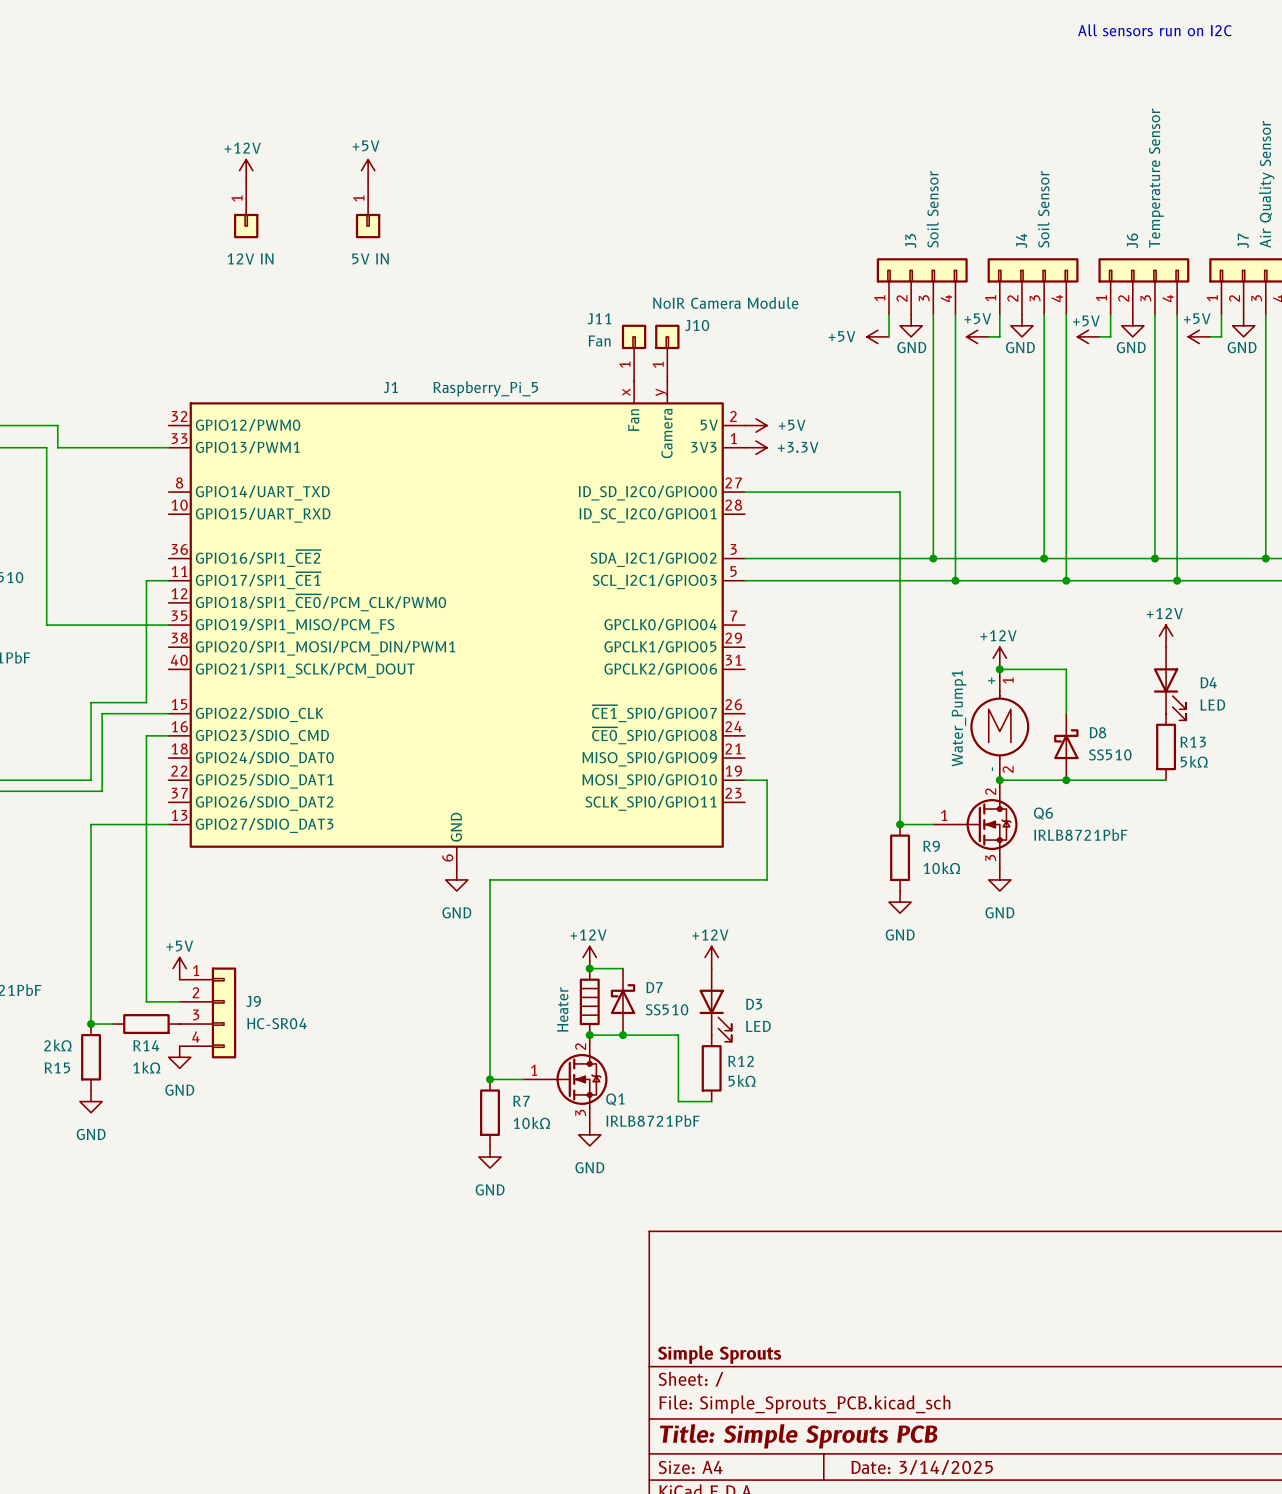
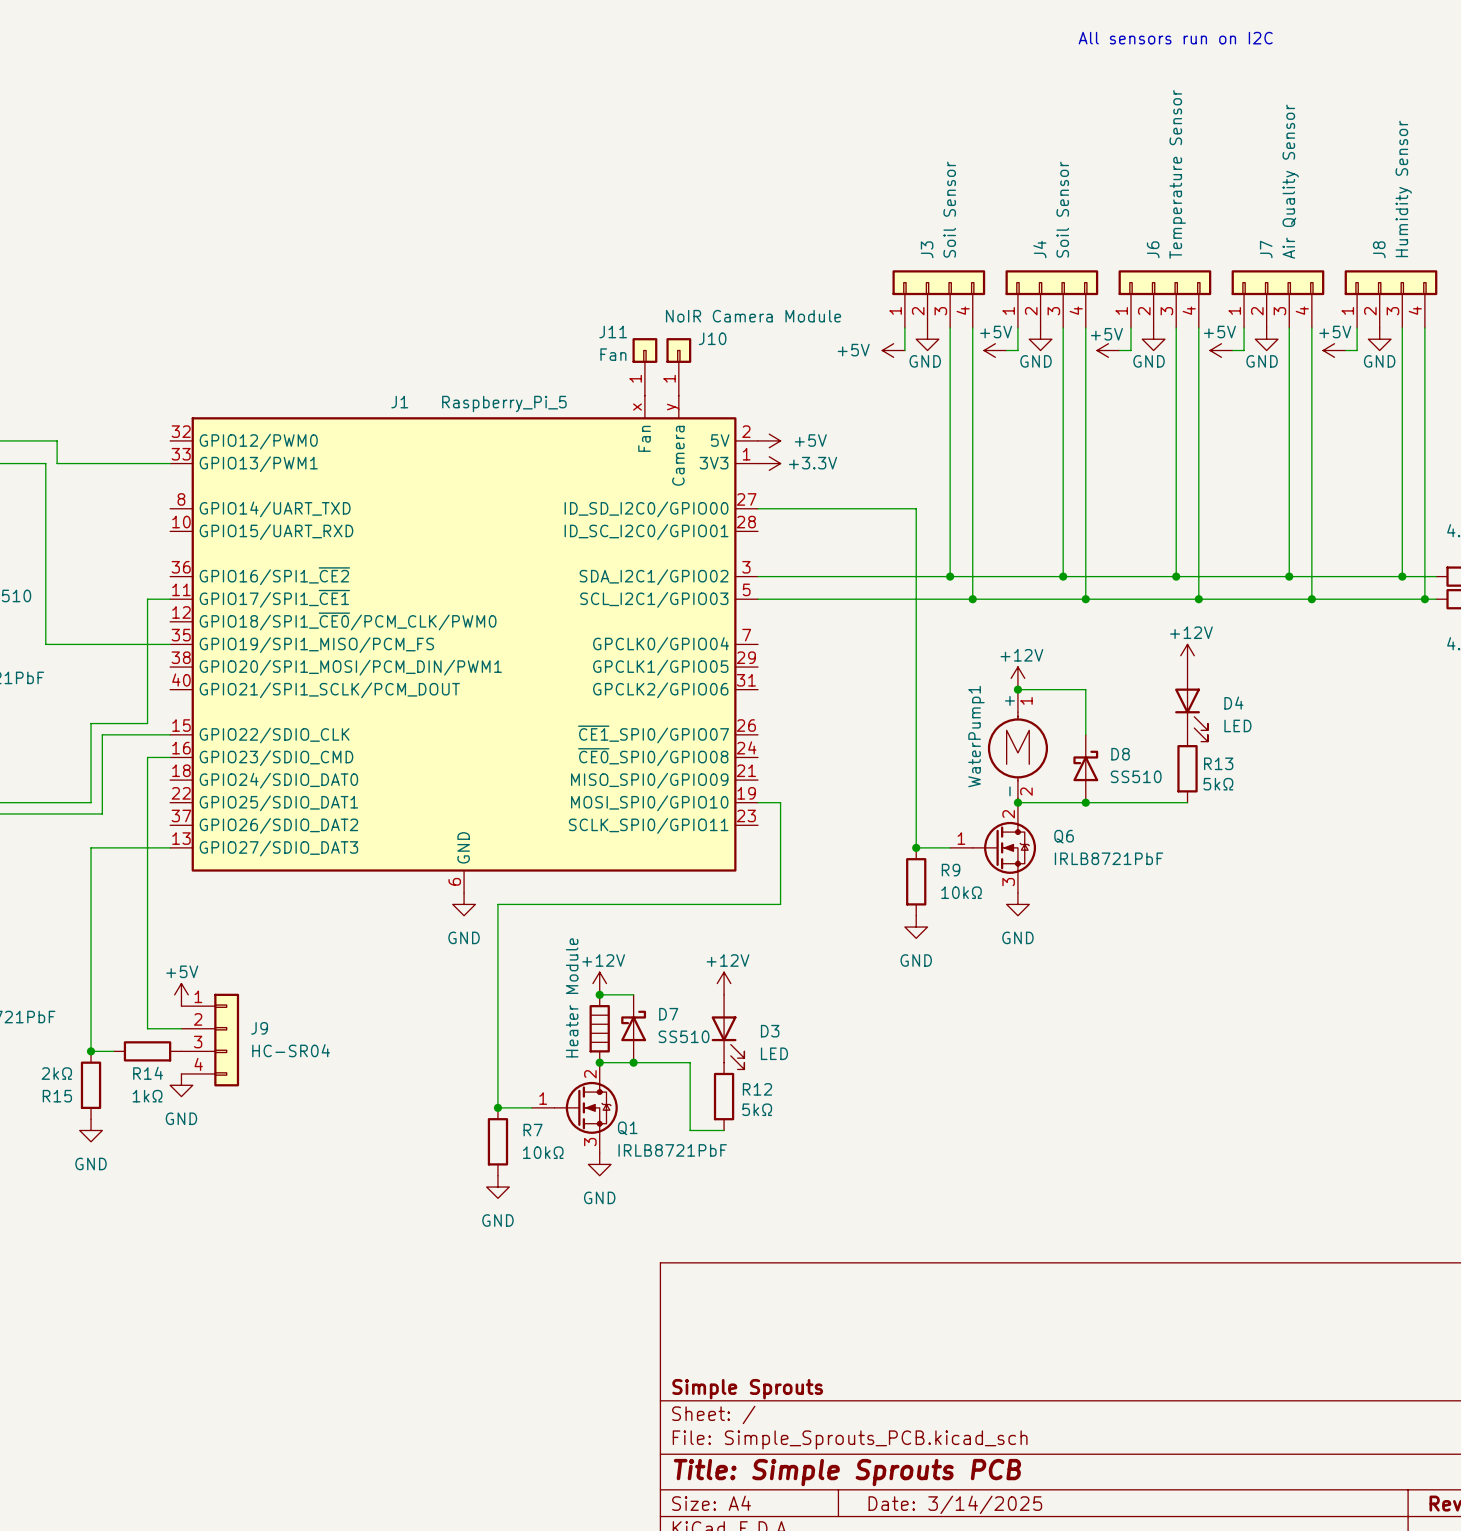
power symbol: +12V (246, 170) -> none
power symbol: +5V (368, 170) -> none
part: 12V IN (246, 209) -> none
part: 5V IN (368, 209) -> none
Water_Pump1 name: Water_Pump1 (959, 718) -> WaterPump1 (976, 736)
part value: Heater (562, 1009) -> Heater Module (572, 997)

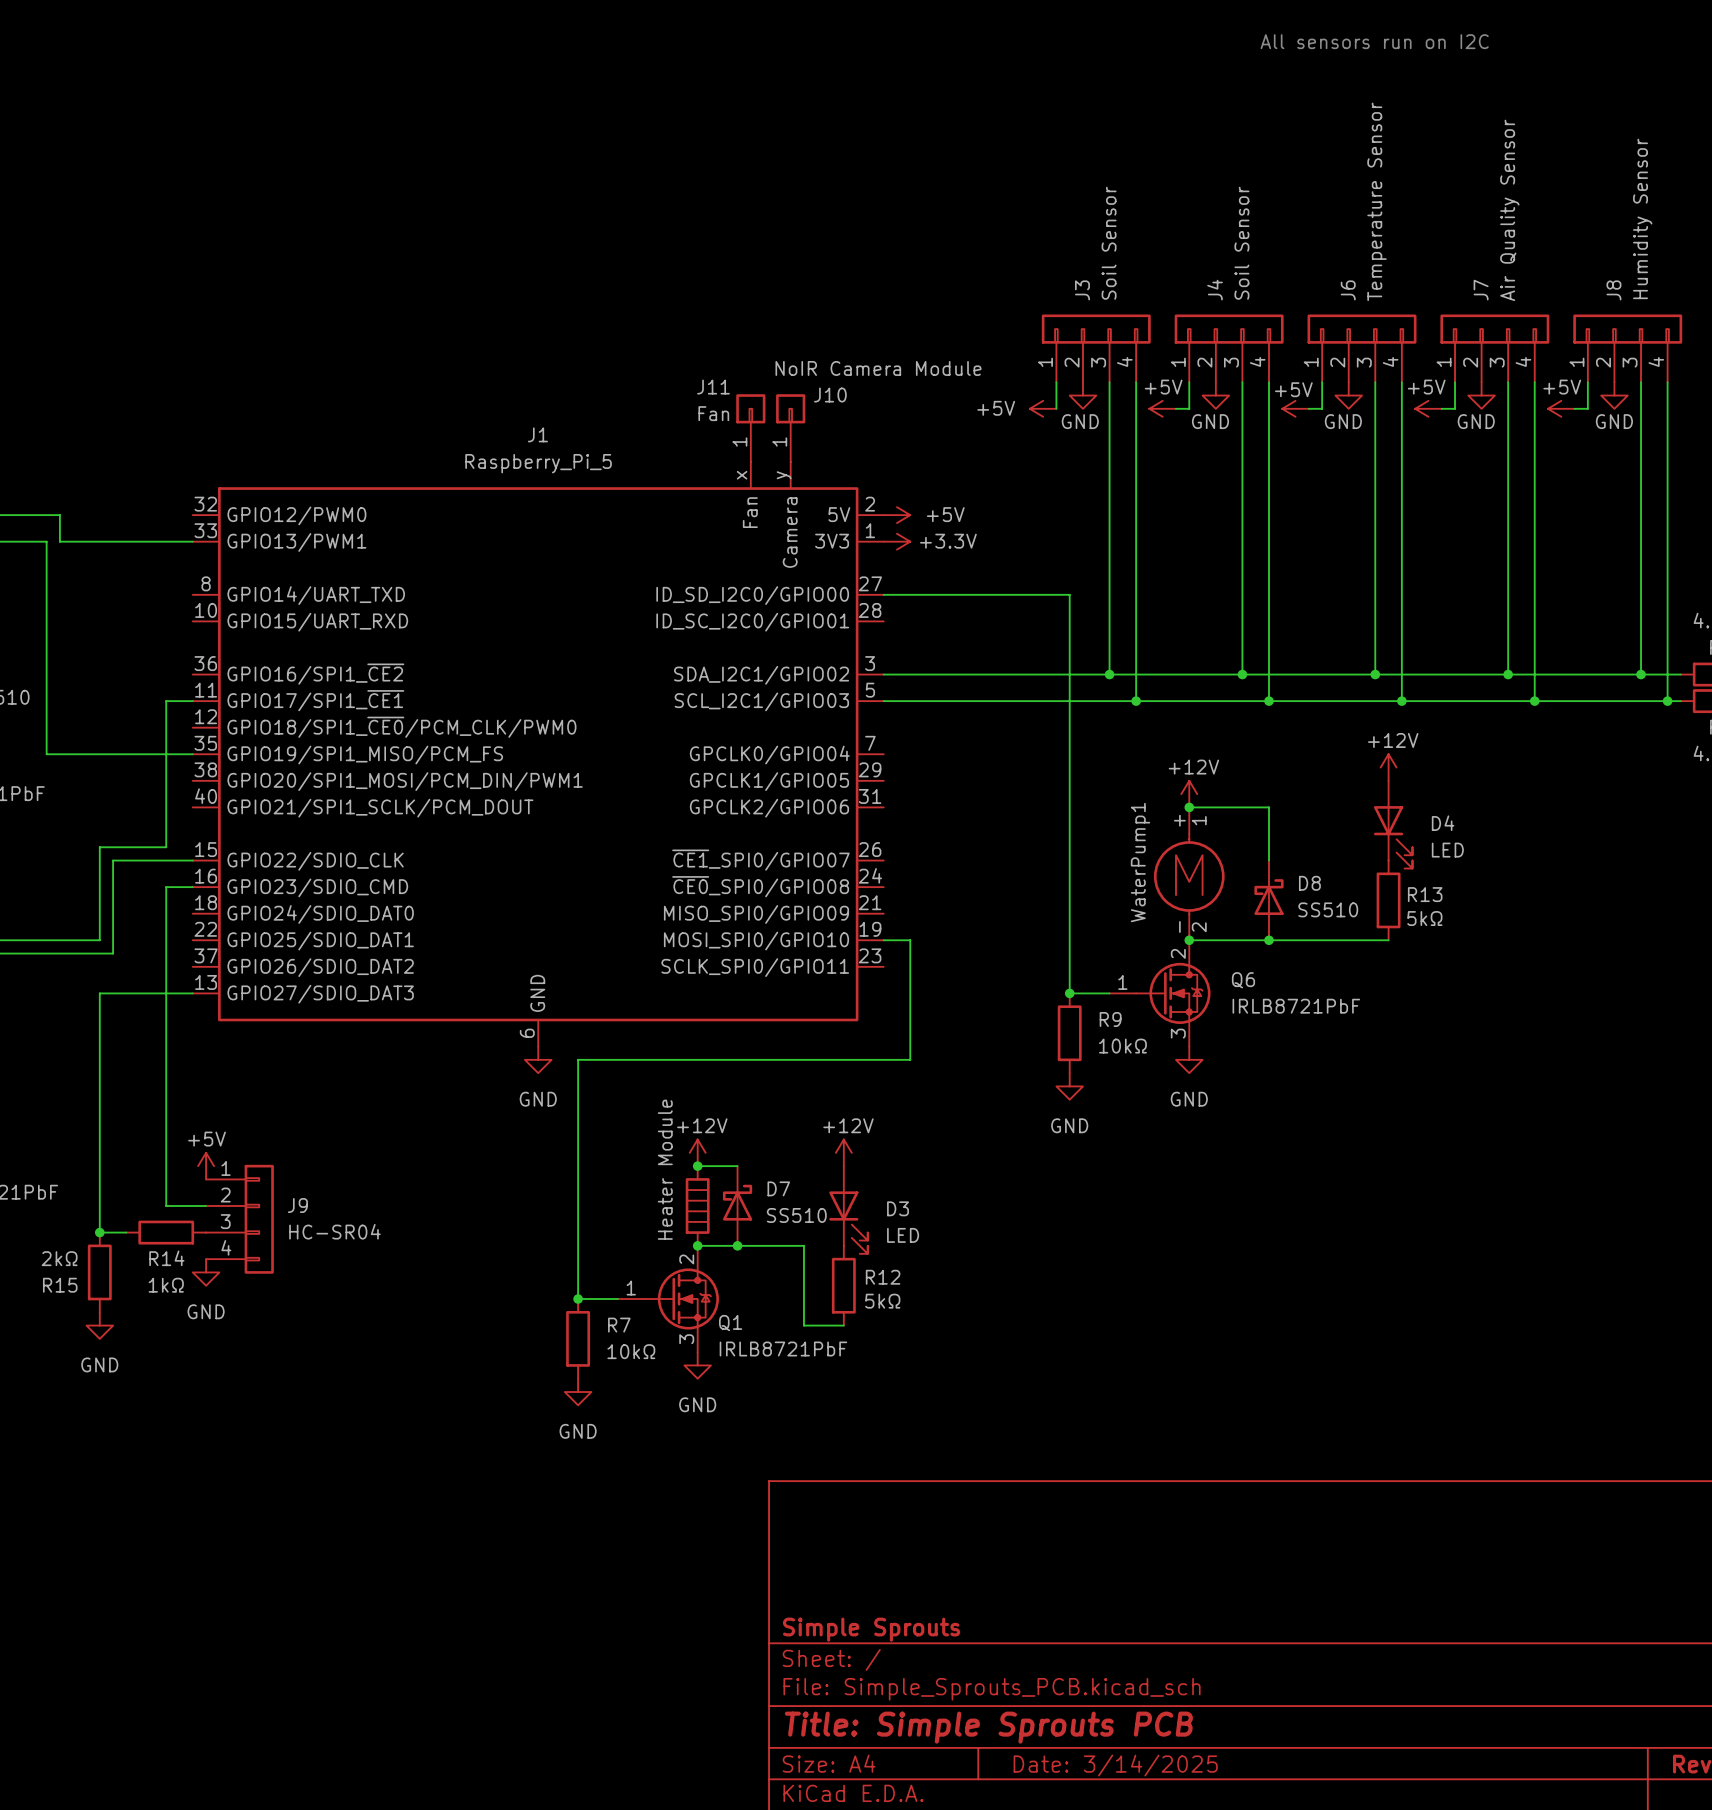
J1 name position: J1 (399, 402) -> J1 (537, 434)
J1 value position: Raspberry_Pi_5 (504, 403) -> Raspberry_Pi_5 (538, 463)

